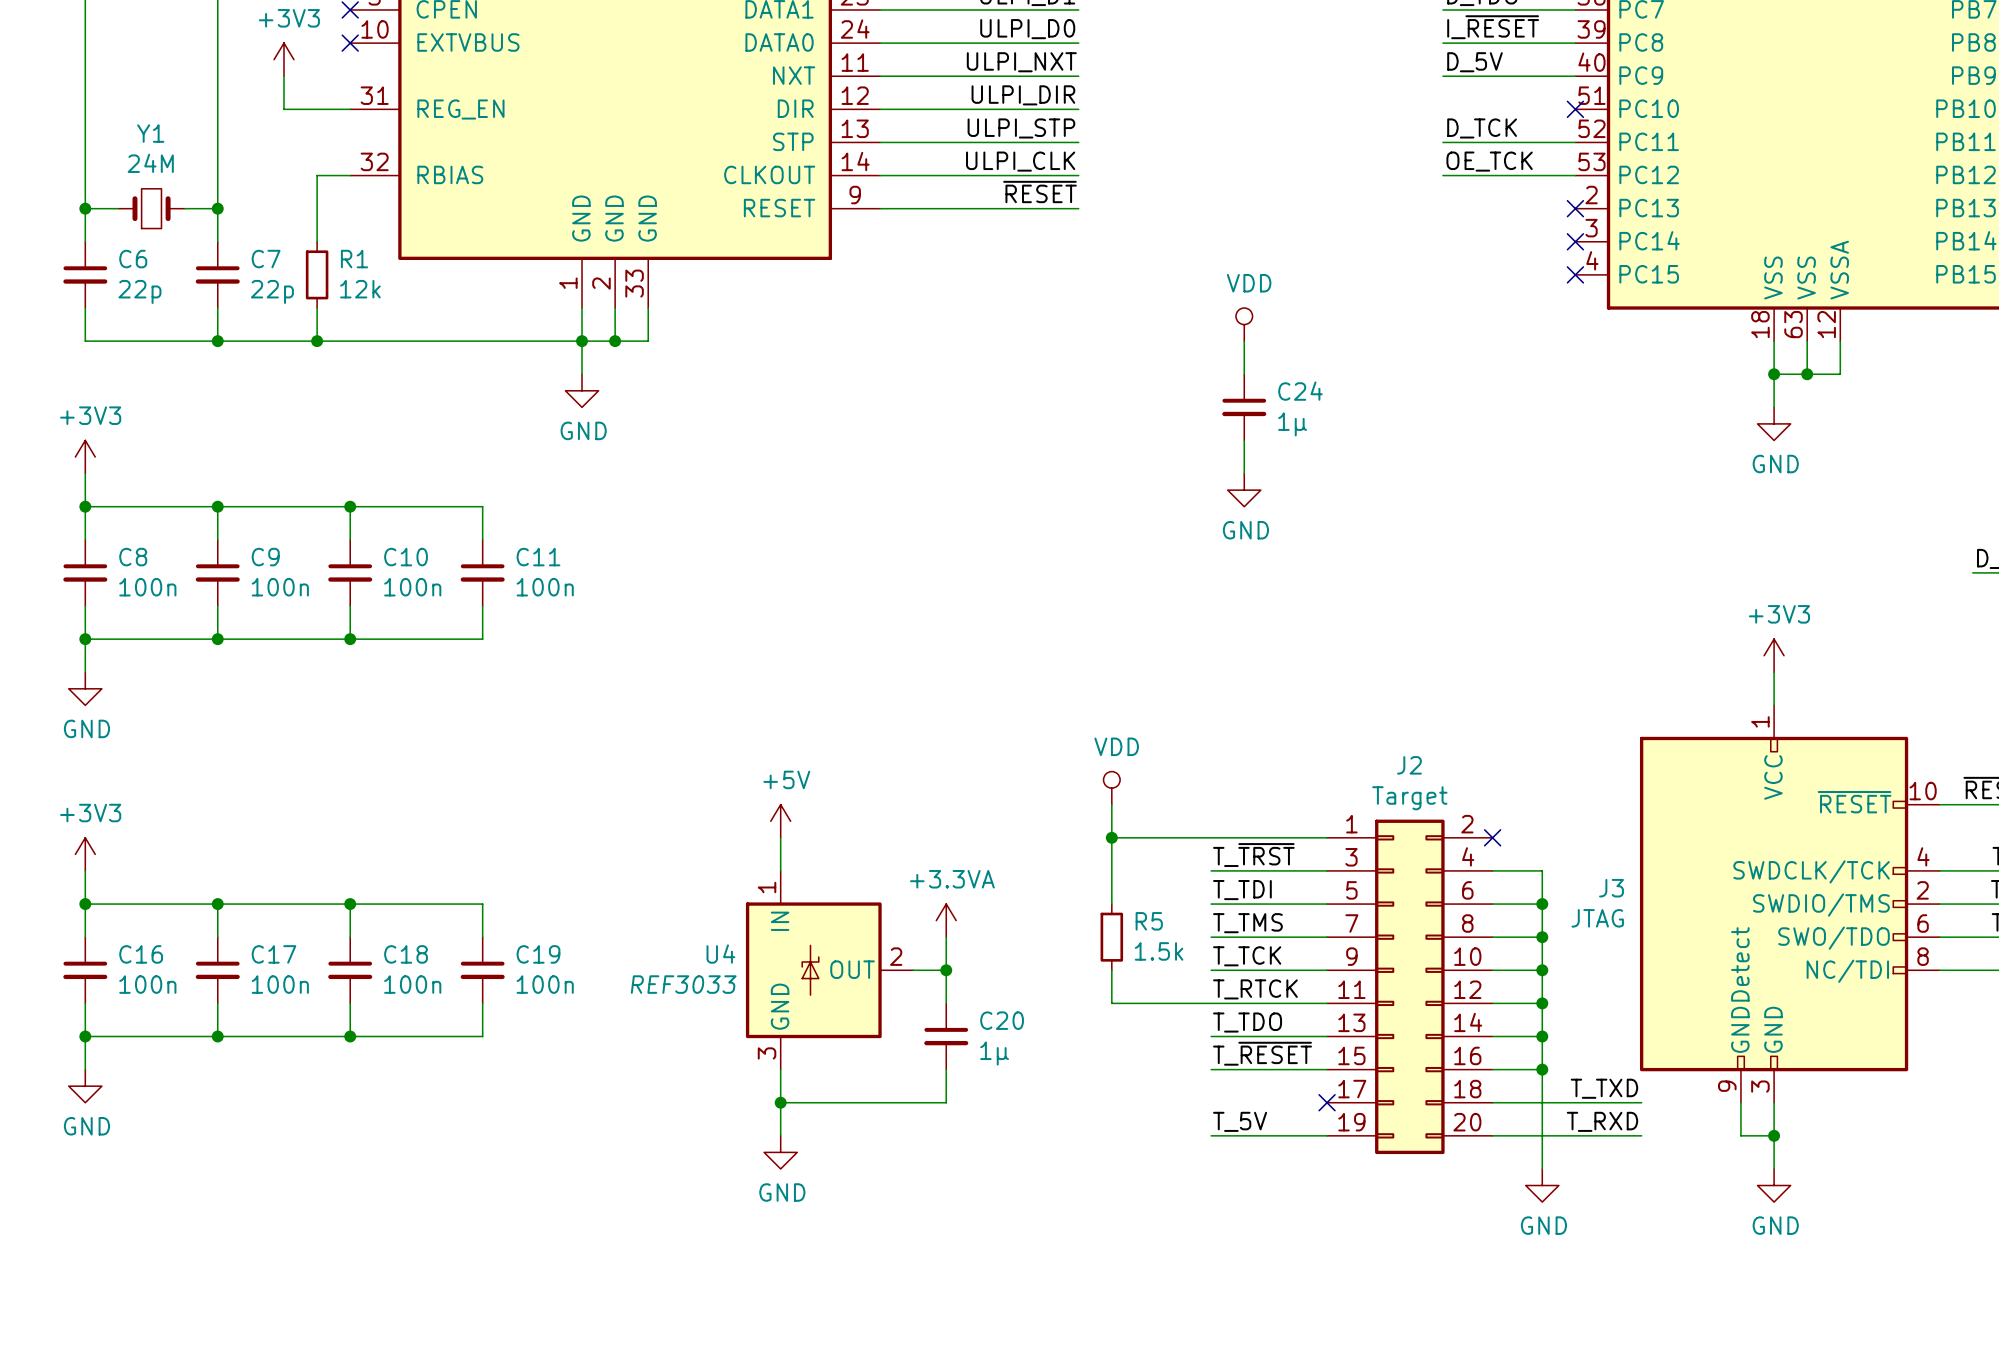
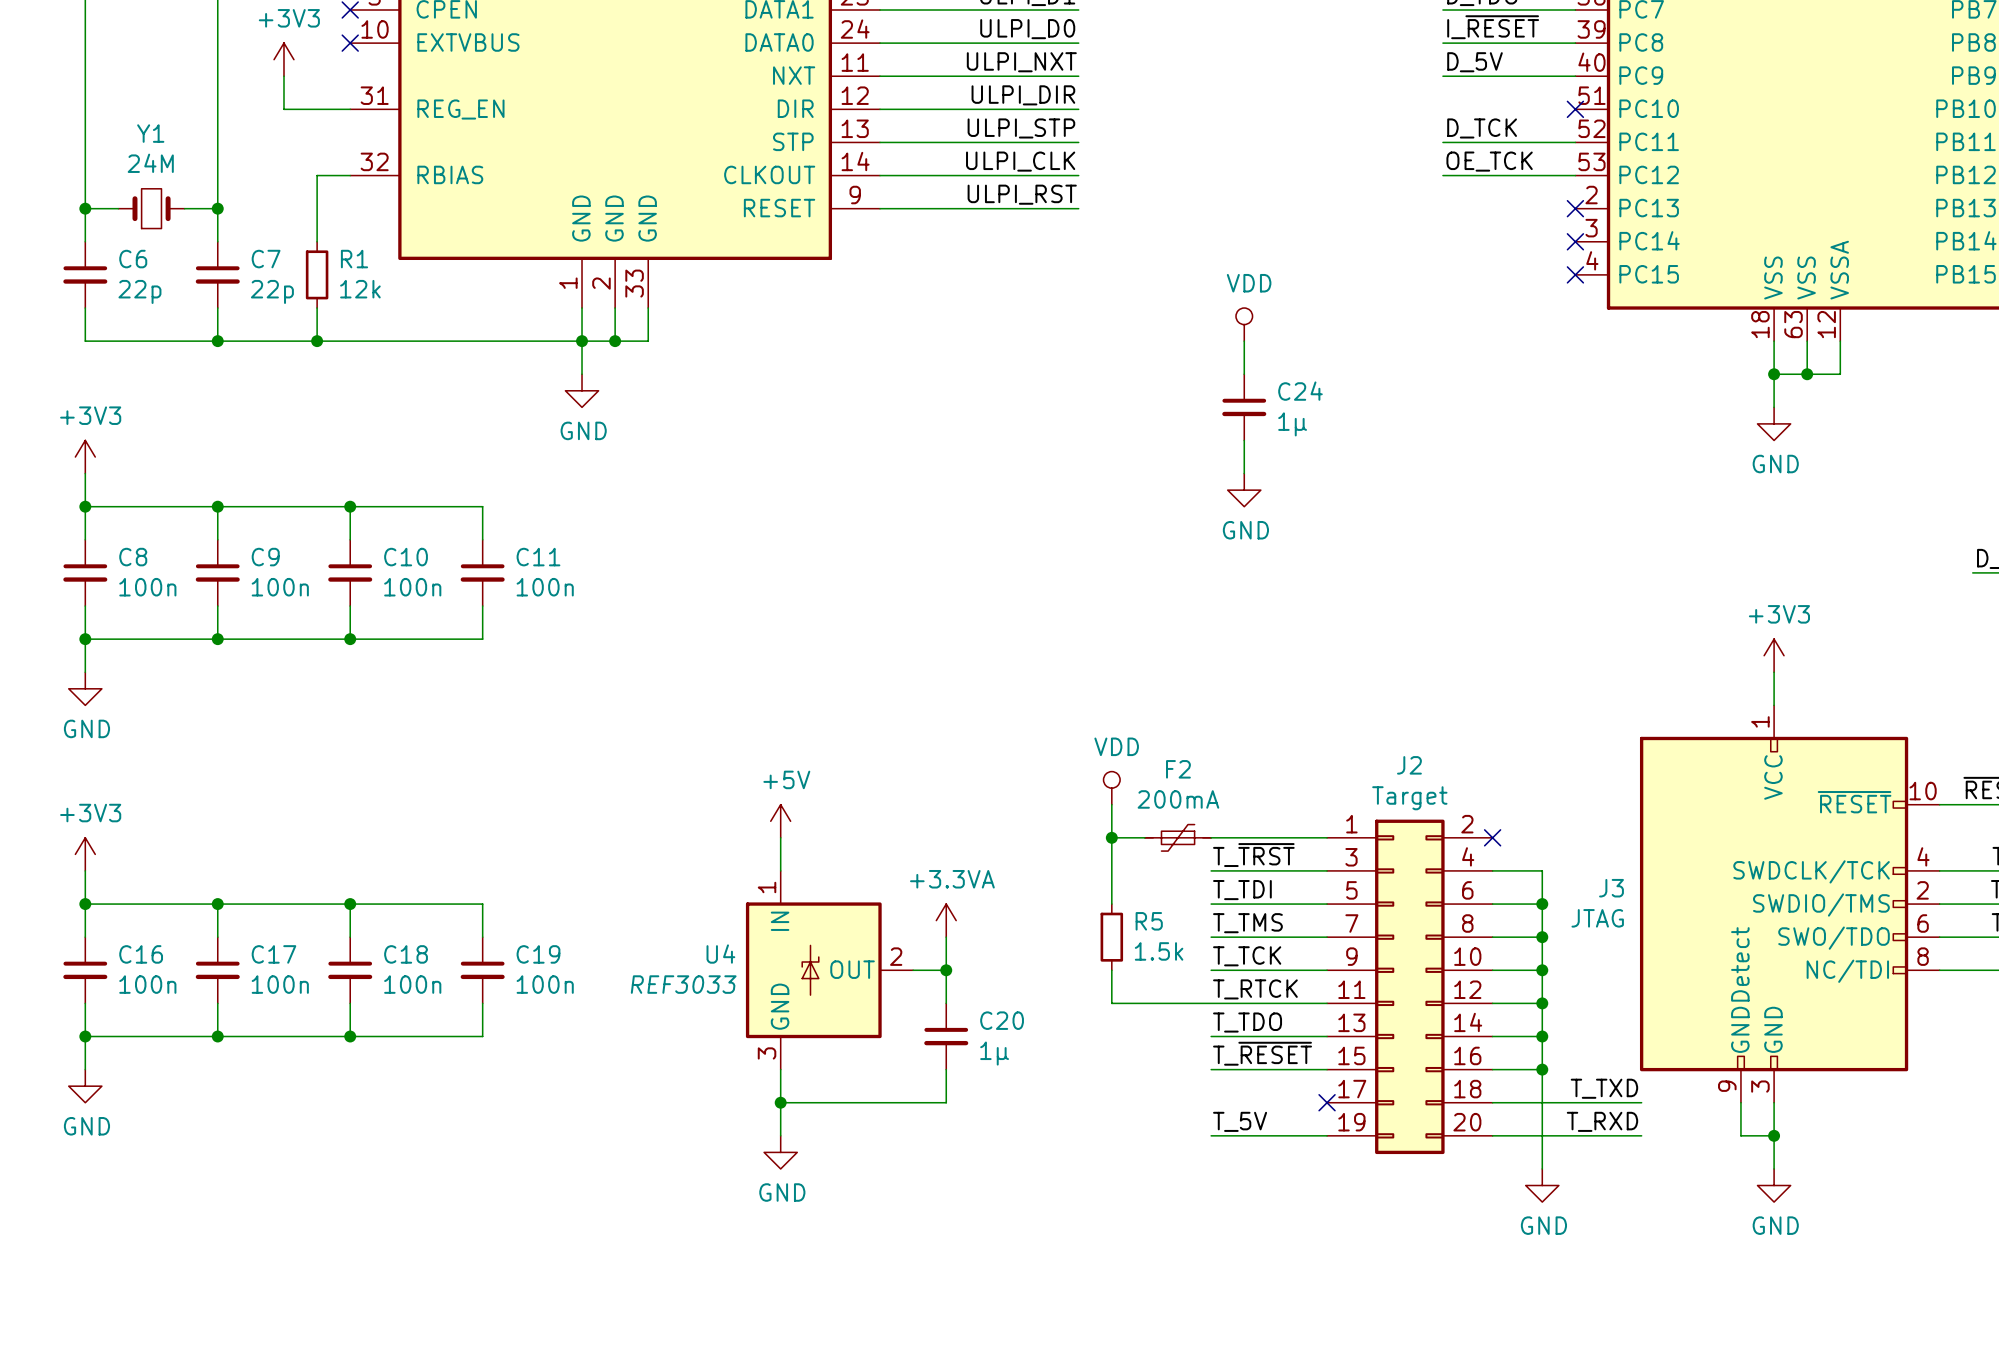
label: ~{RESET} (1039, 192) -> ULPI_RST (1022, 194)
F2: none -> 200mA (1178, 837)

